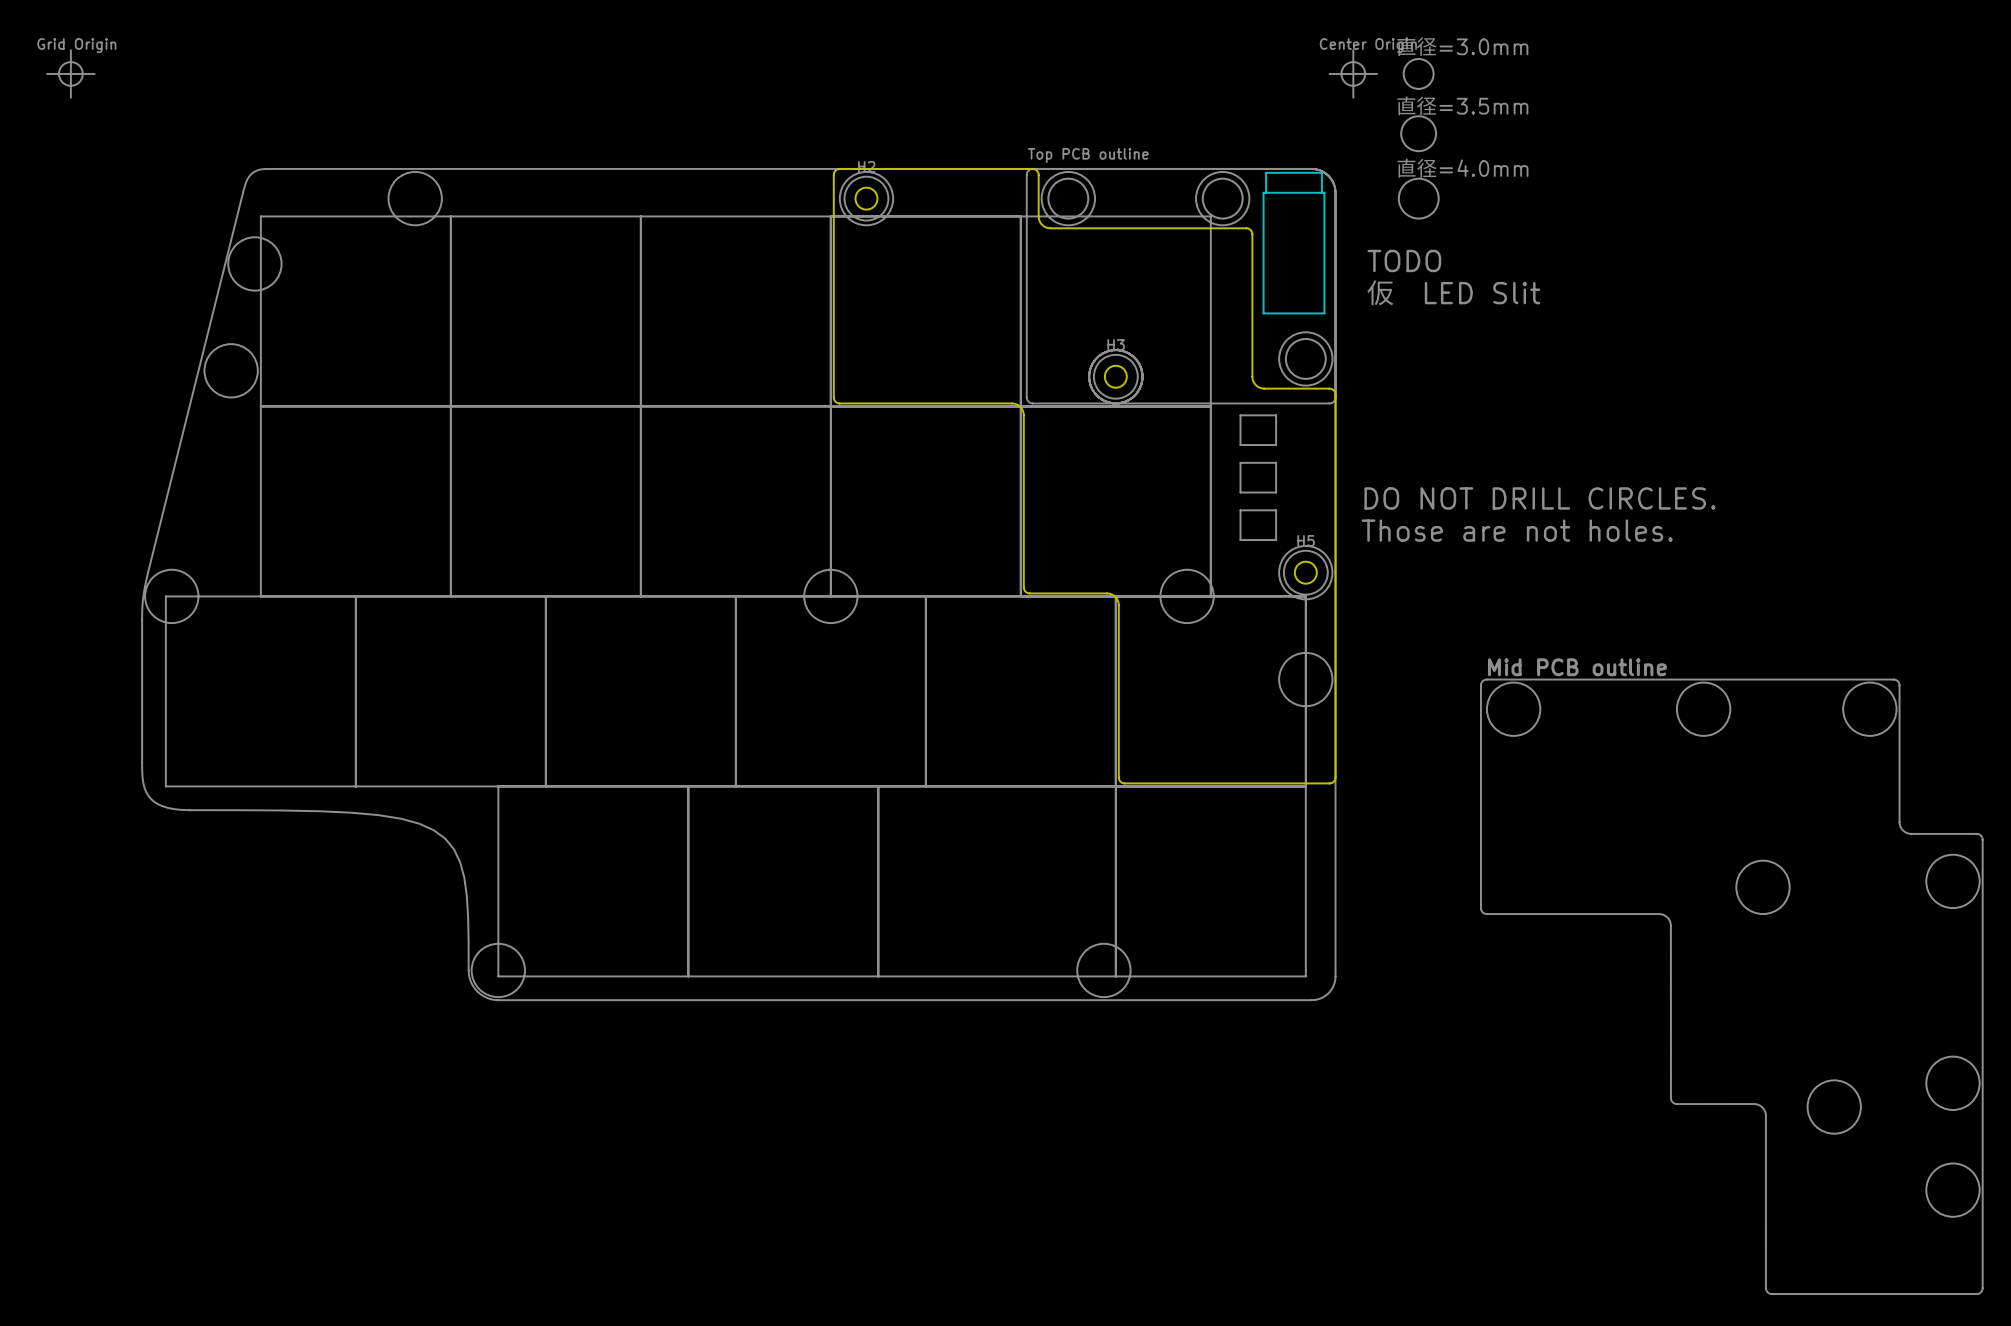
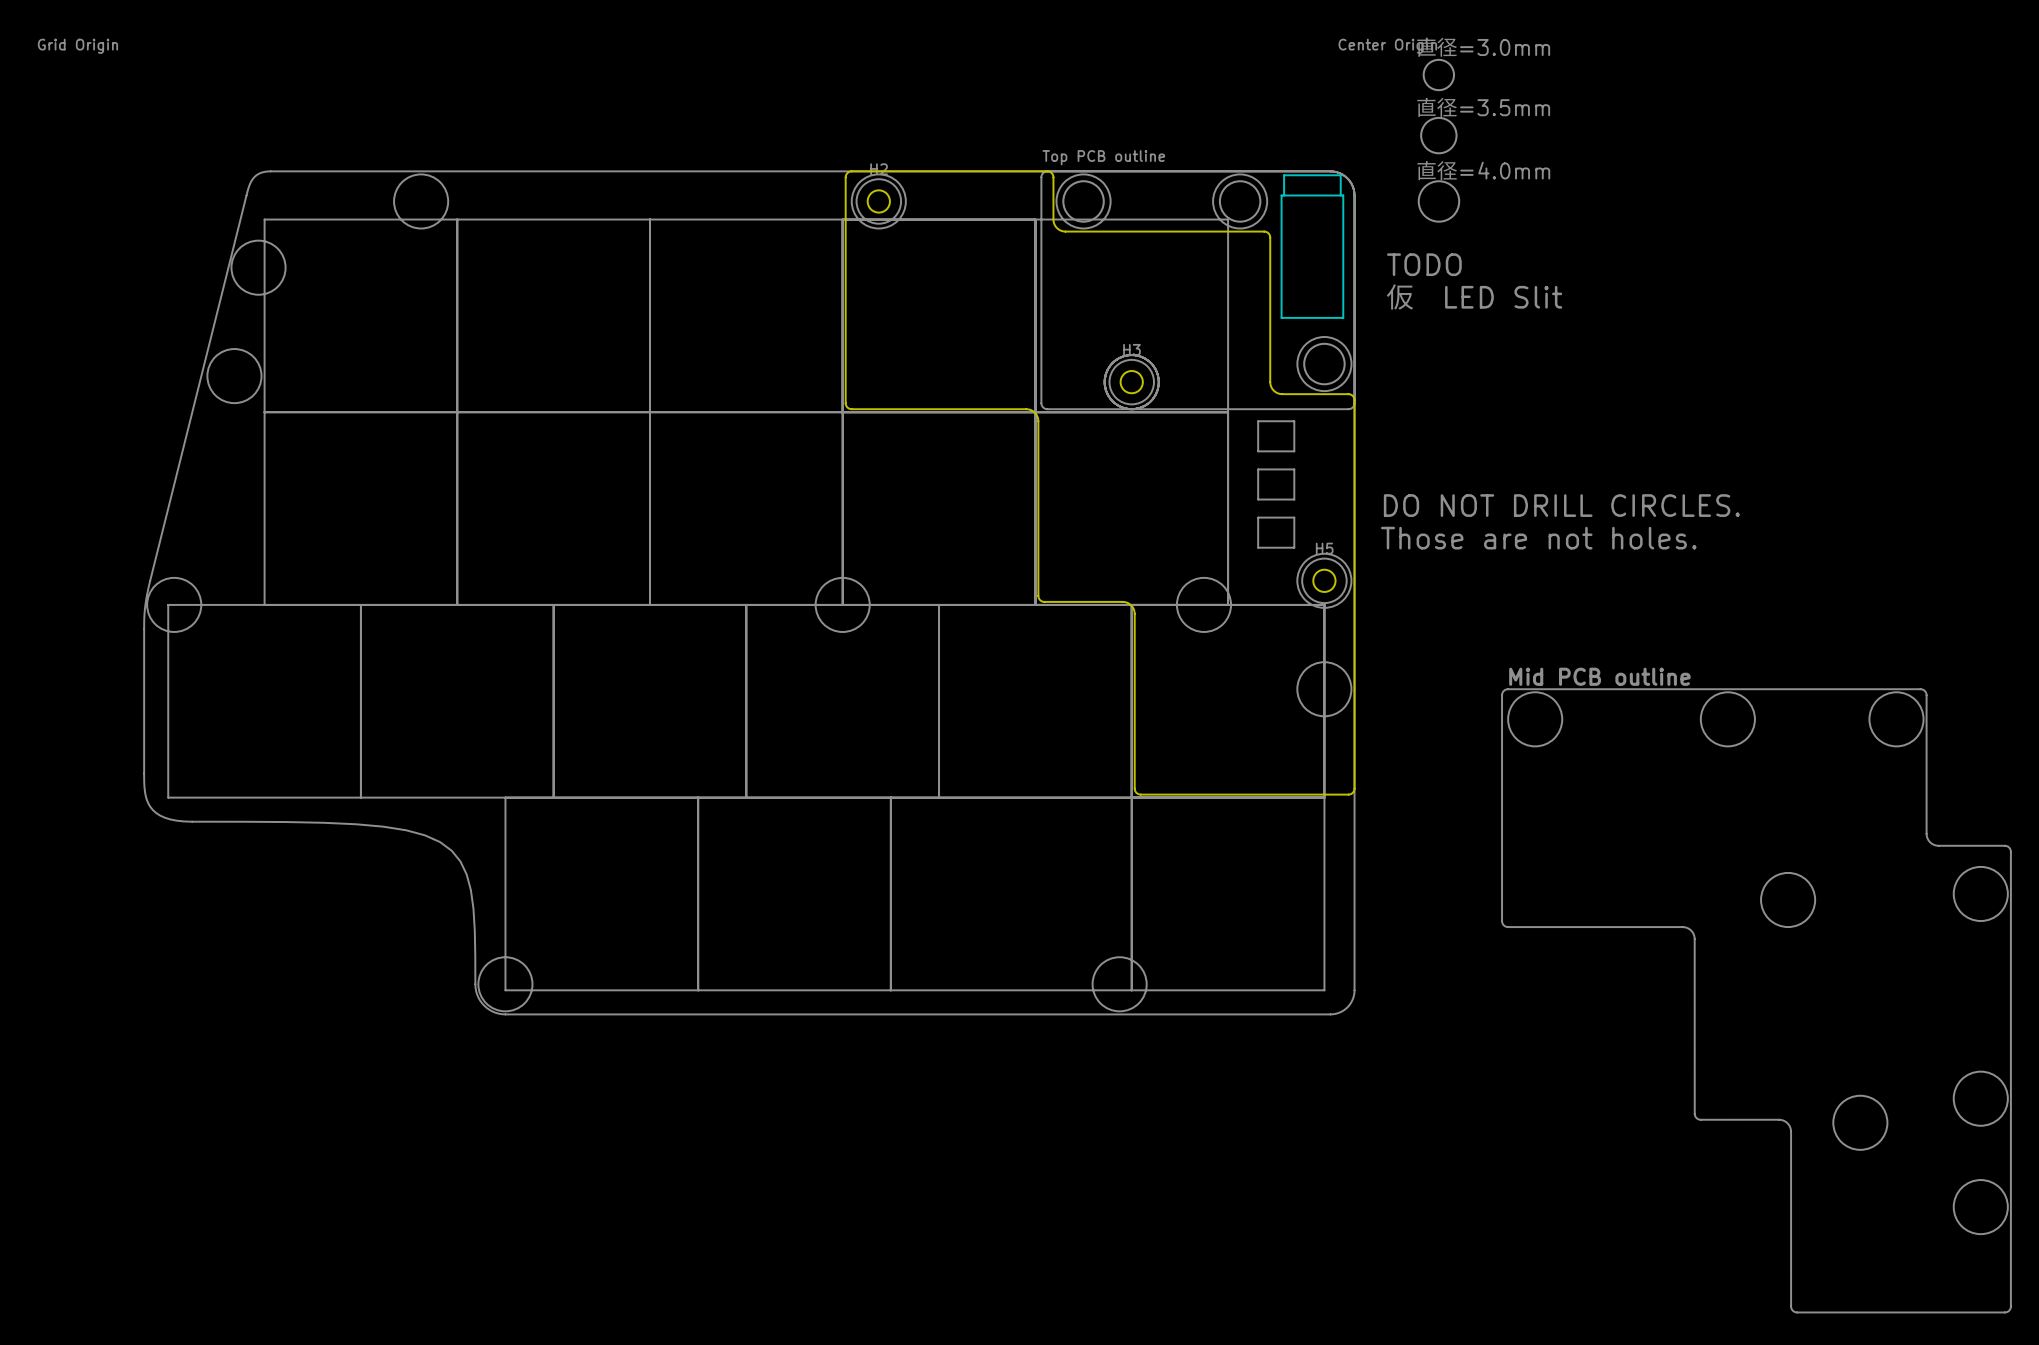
line: (70, 50) (70, 97) -> none
line: (1353, 50) (1353, 97) -> none
drawing: [58, 61, 84, 87] -> none
drawing: [1340, 61, 1366, 87] -> none
line: (47, 73) (94, 73) -> none
line: (1329, 73) (1377, 73) -> none

